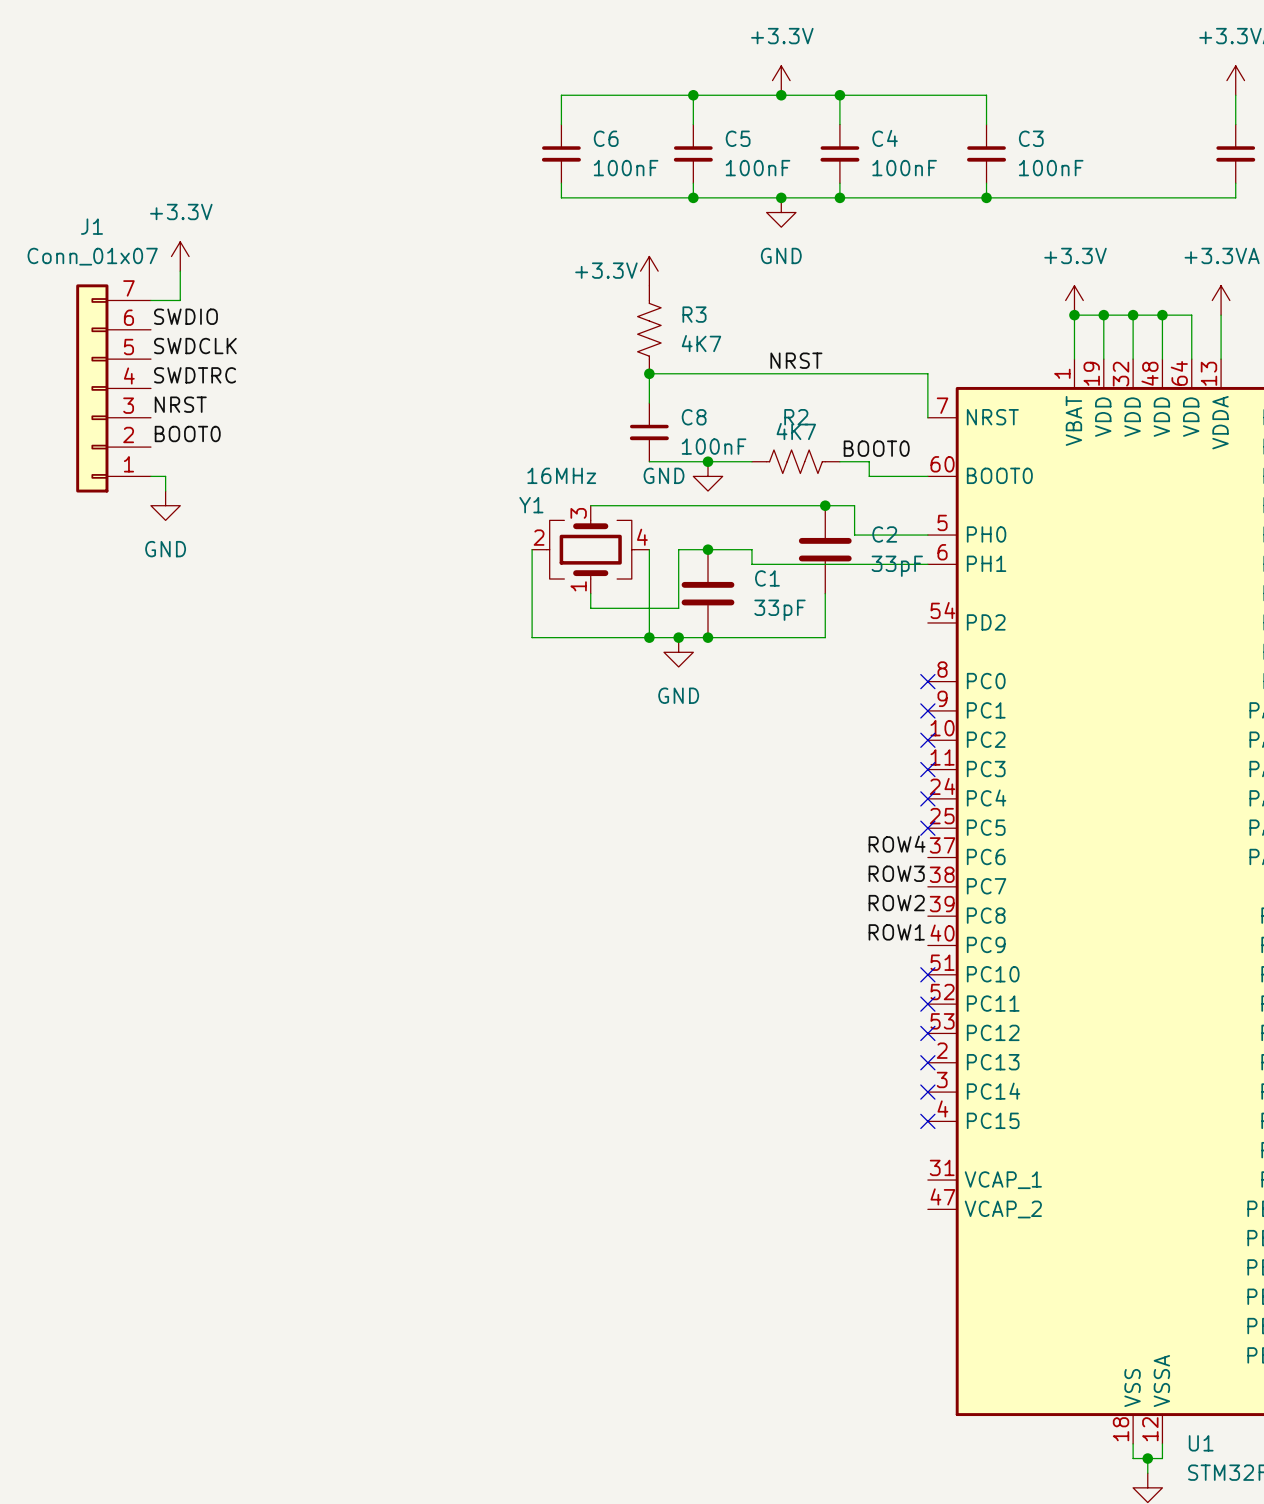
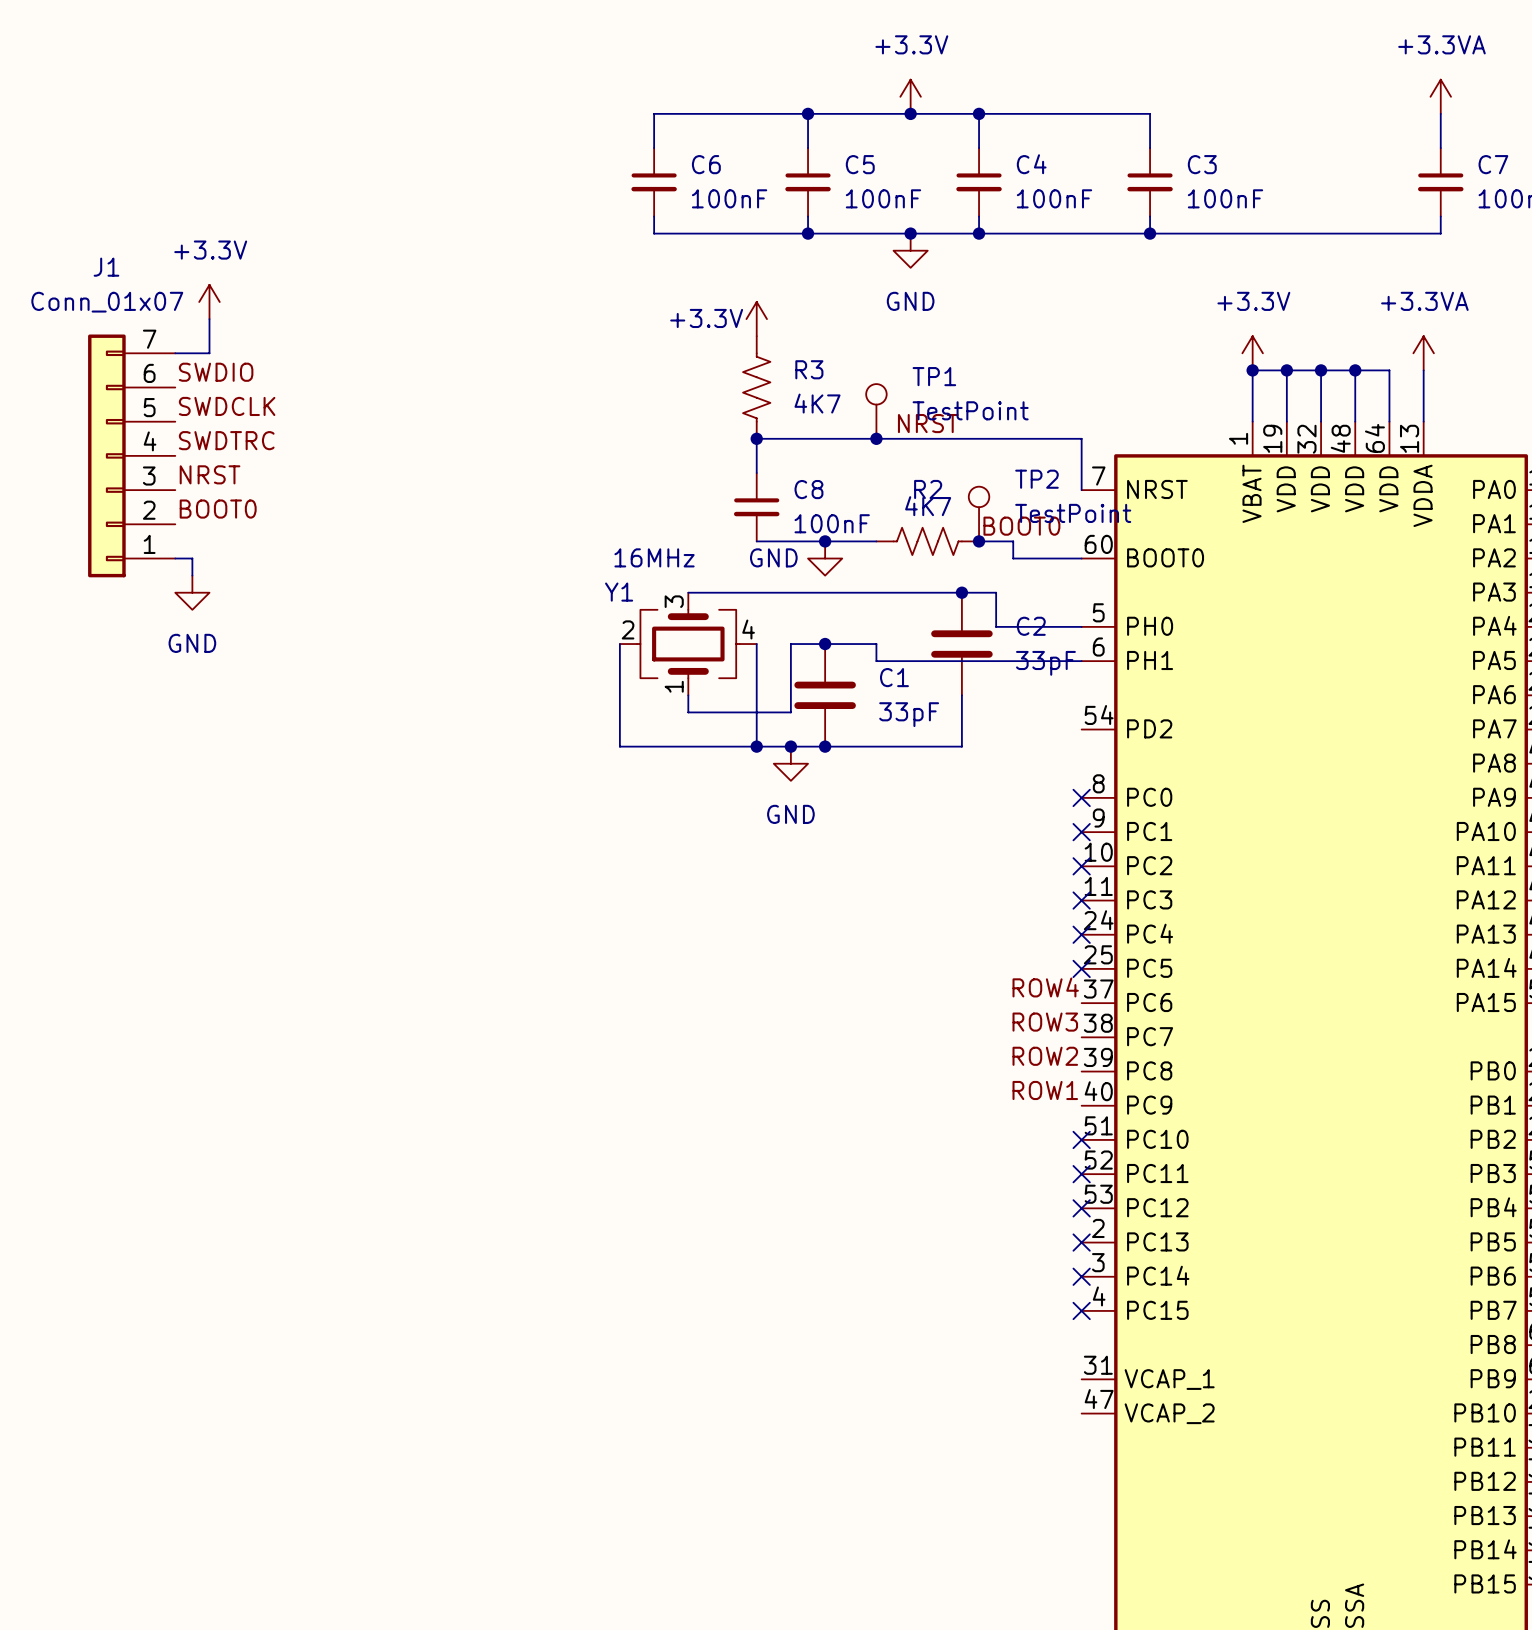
TP1: none -> TestPoint (876, 411)
junction: none -> (876, 438)
TP2: none -> TestPoint (979, 514)
junction: none -> (979, 541)

